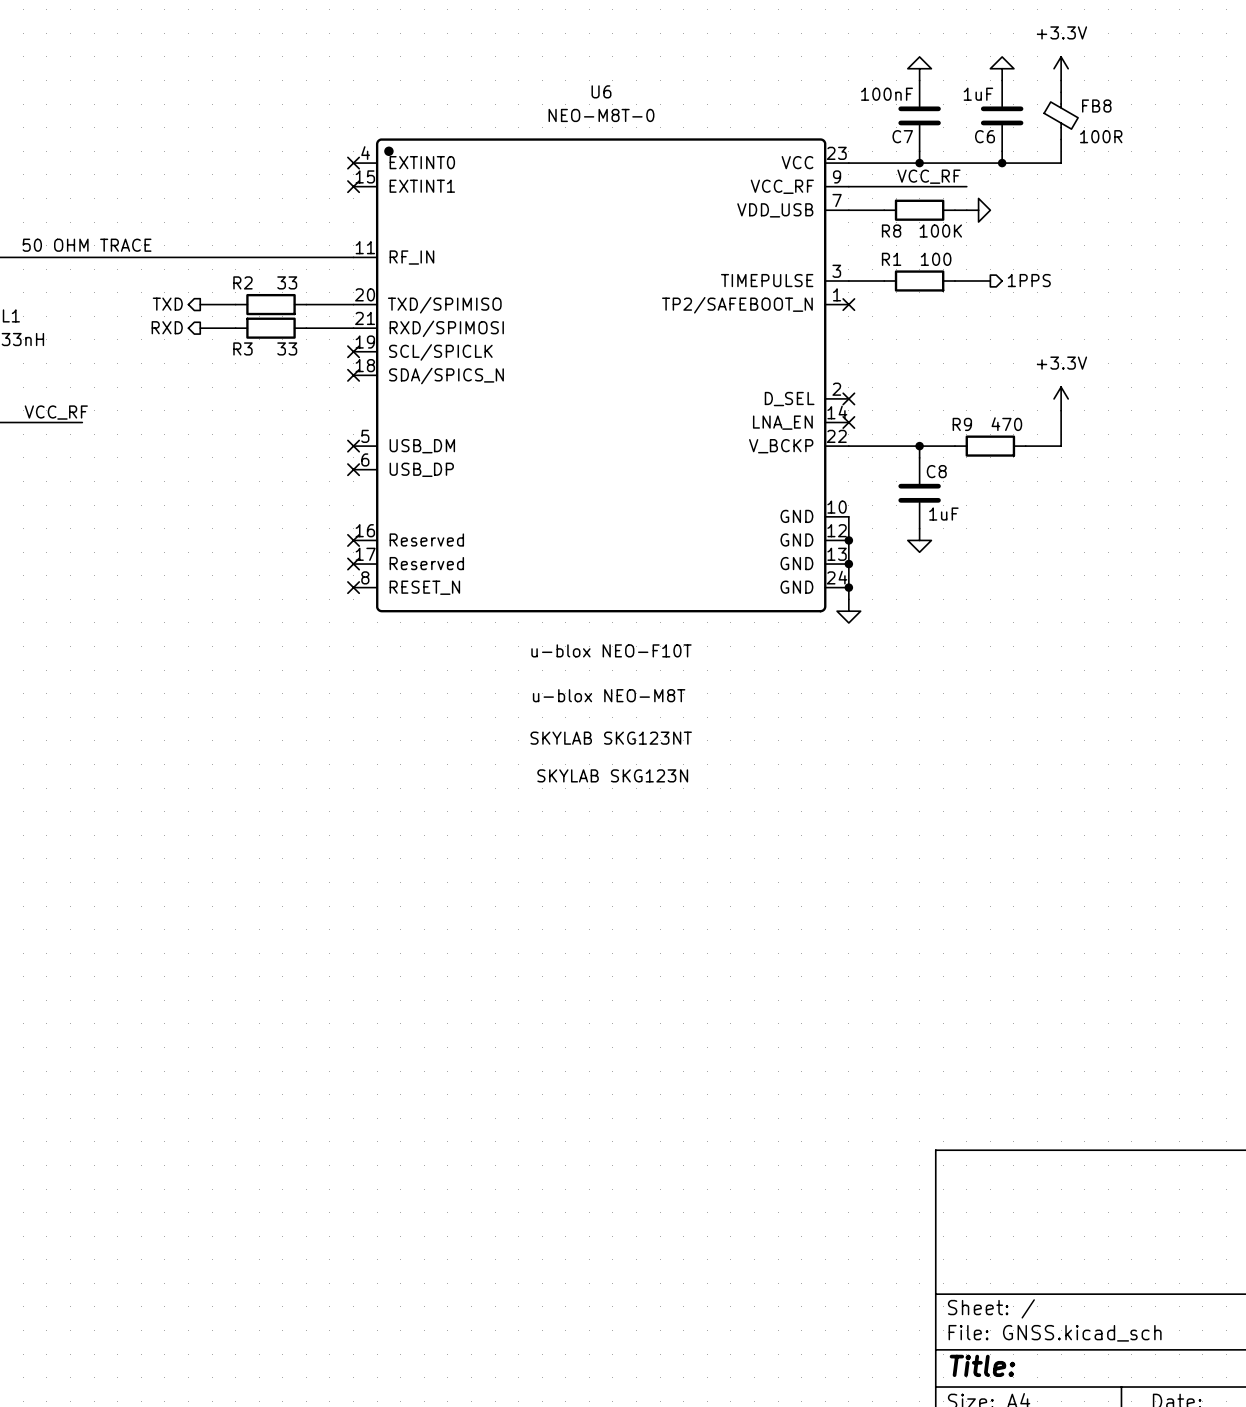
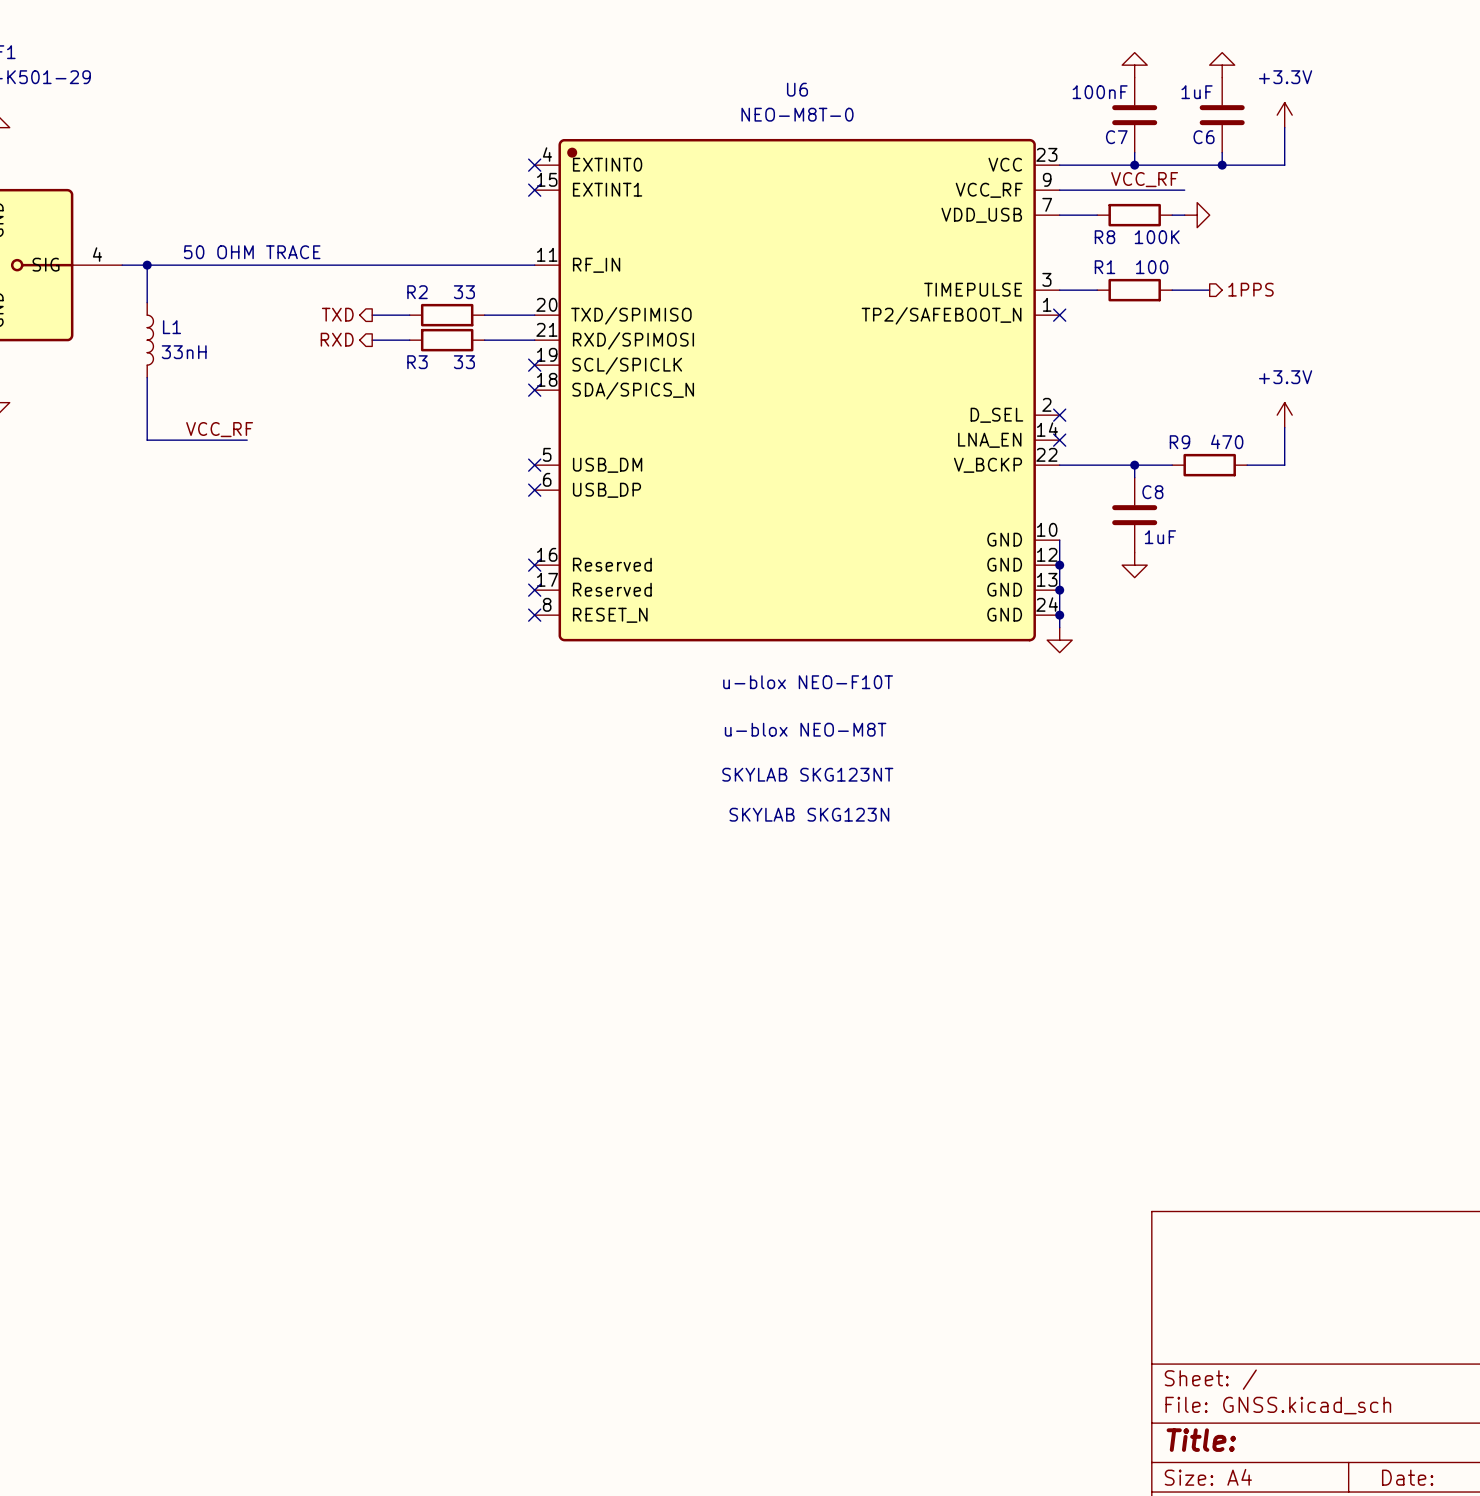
power symbol position: +3.3V (1061, 68) -> +3.3V (1284, 115)
FB8: 100R (1061, 115) -> none

